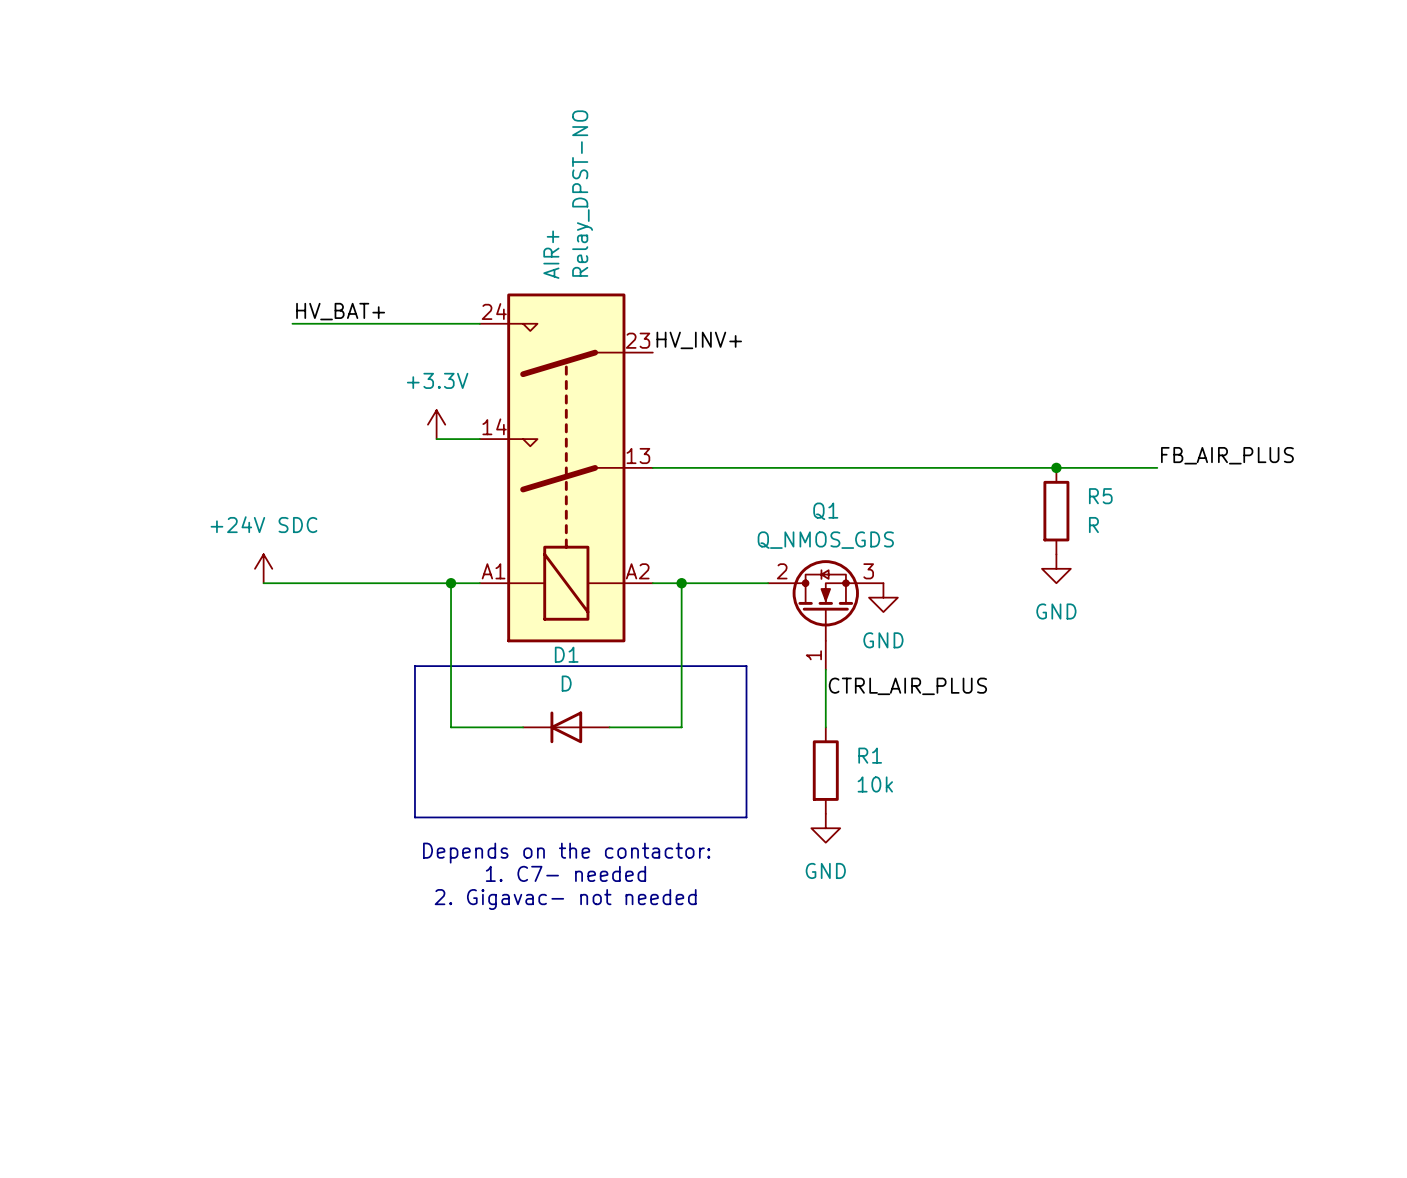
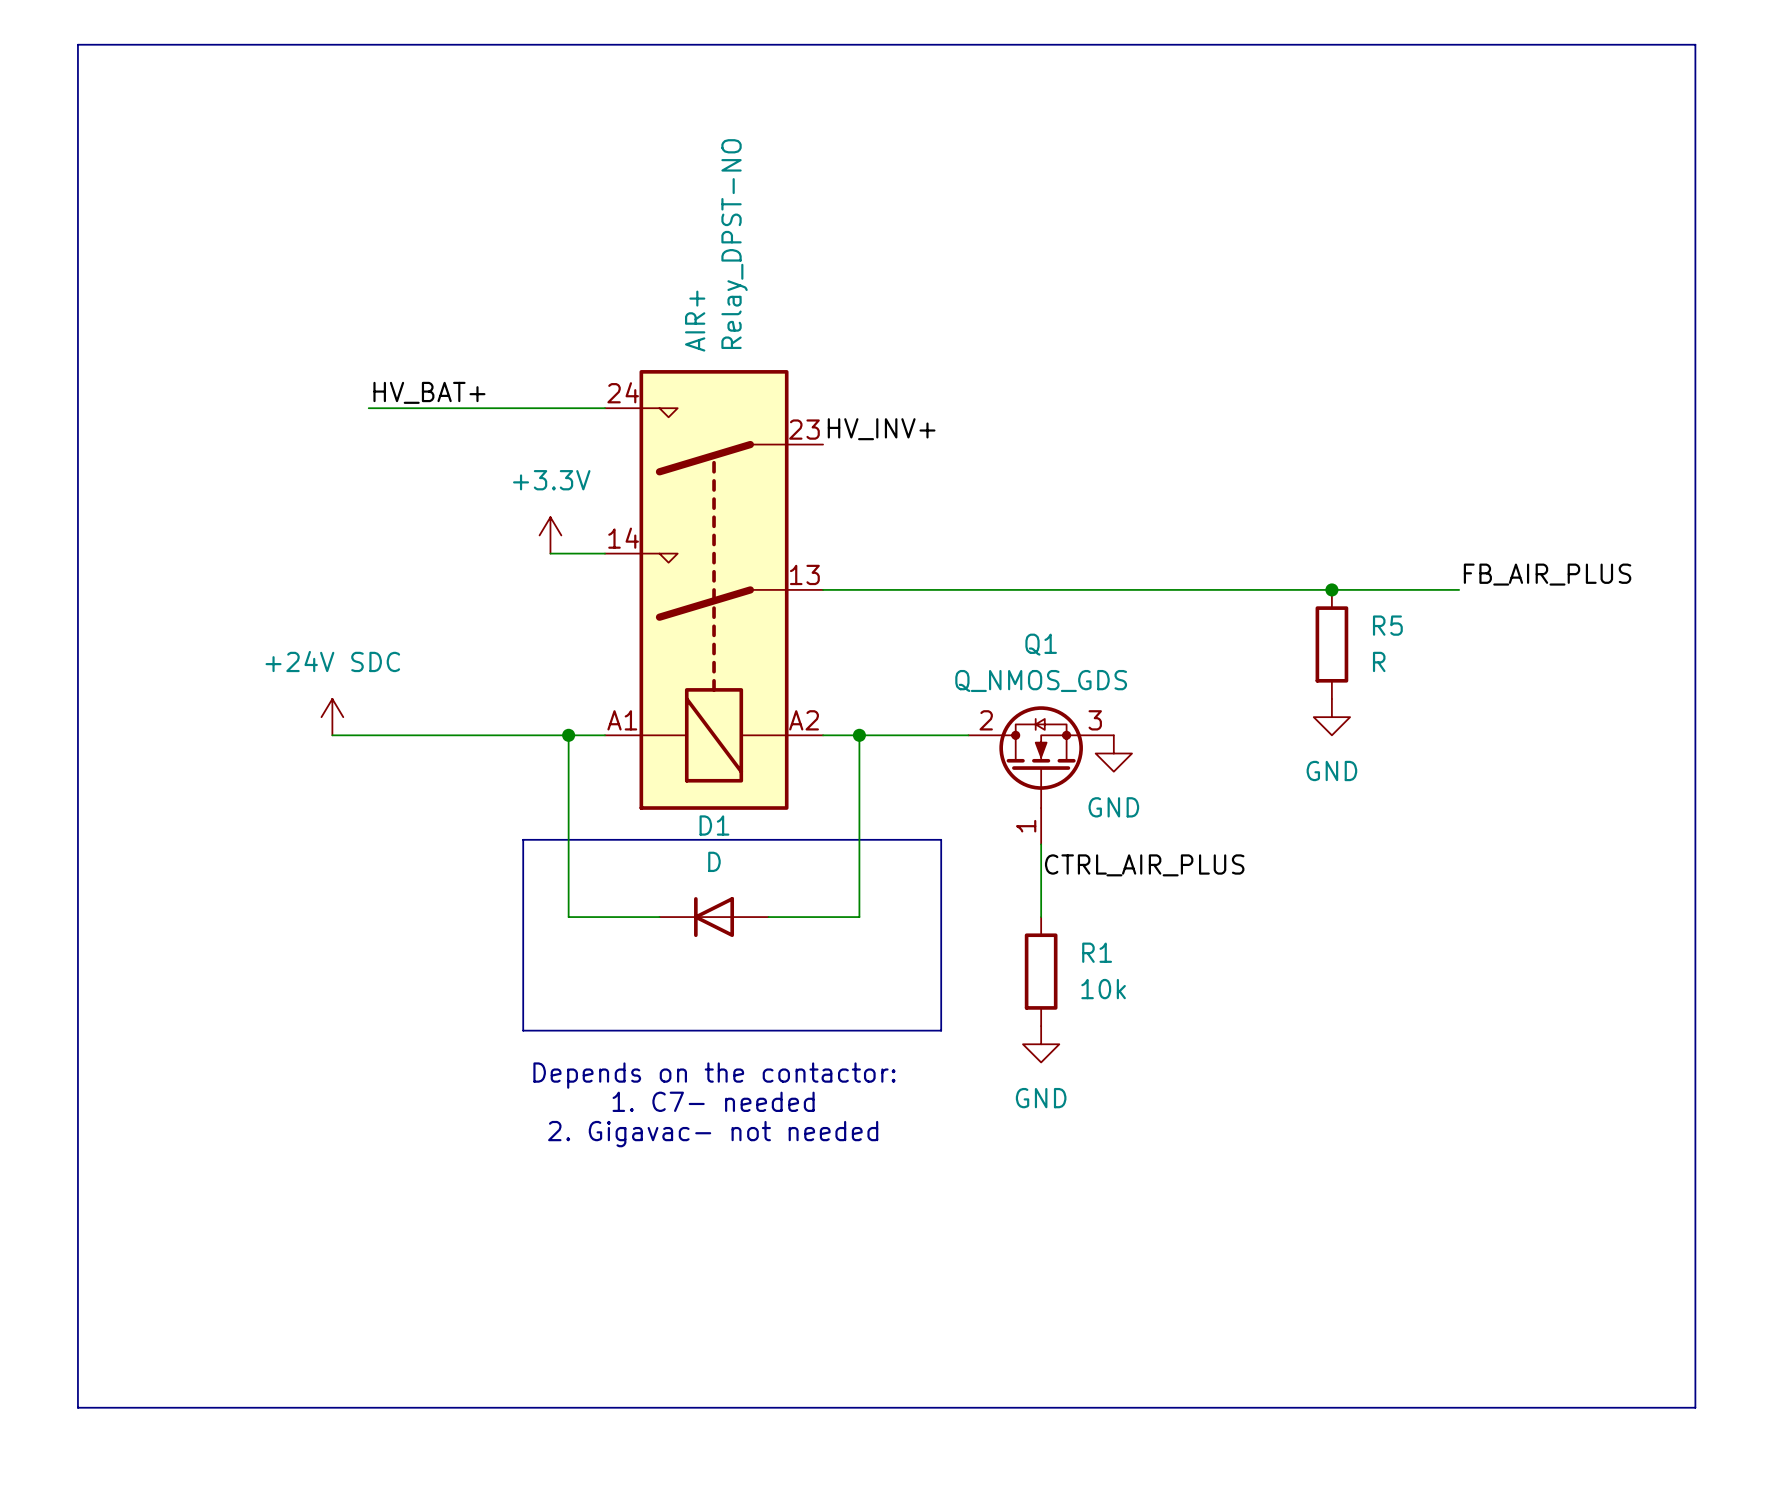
line: none -> (77, 44) (1695, 44) (1695, 1407) (77, 1407) (77, 44)

